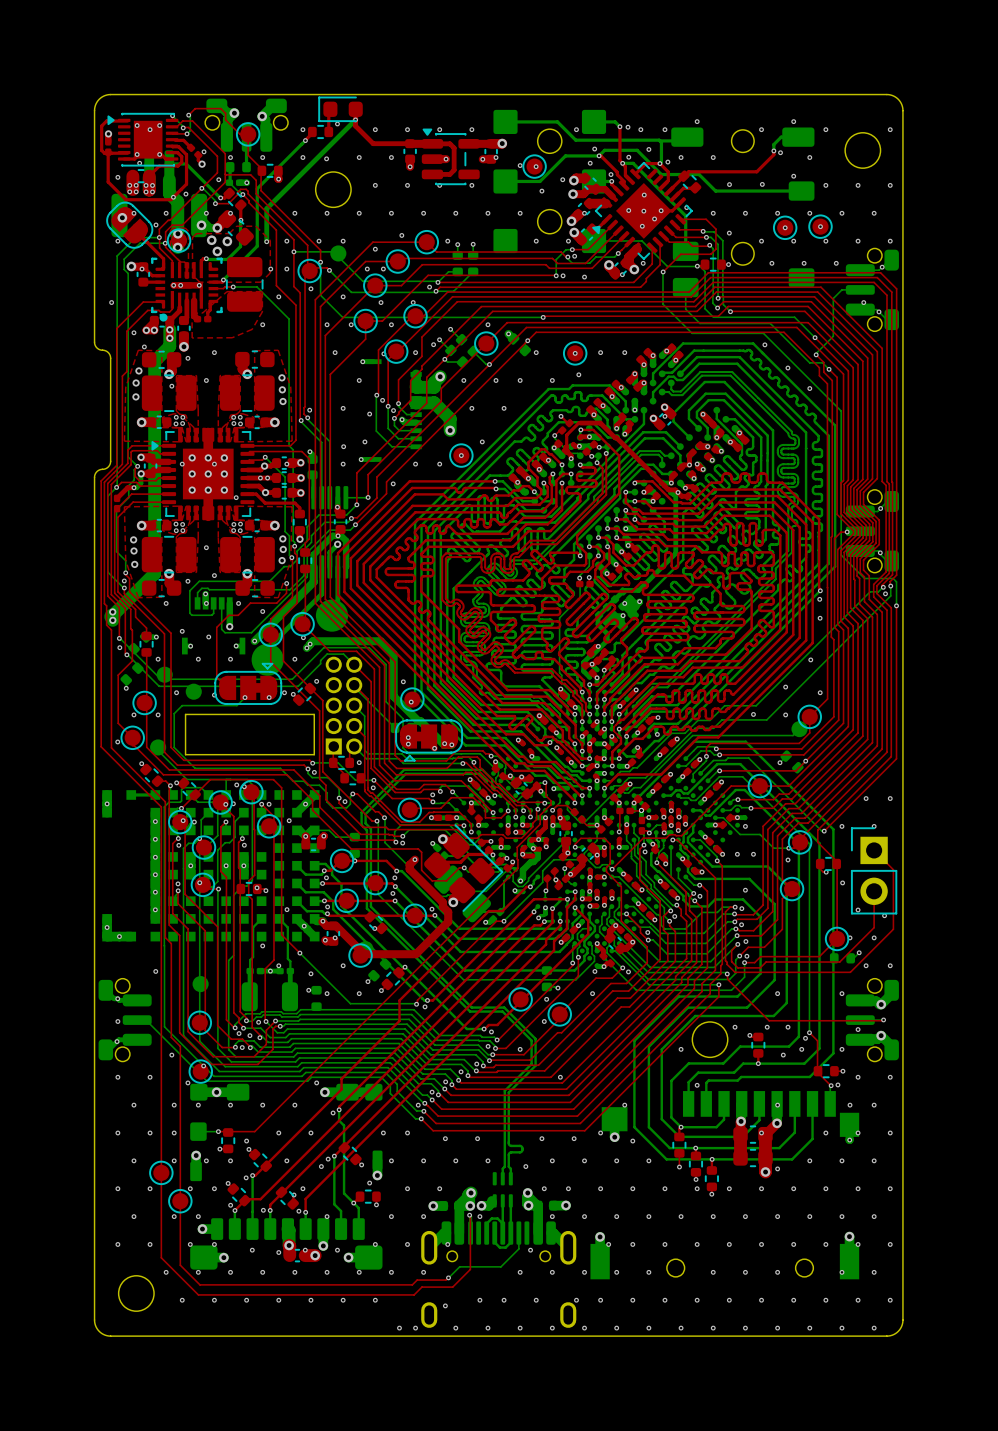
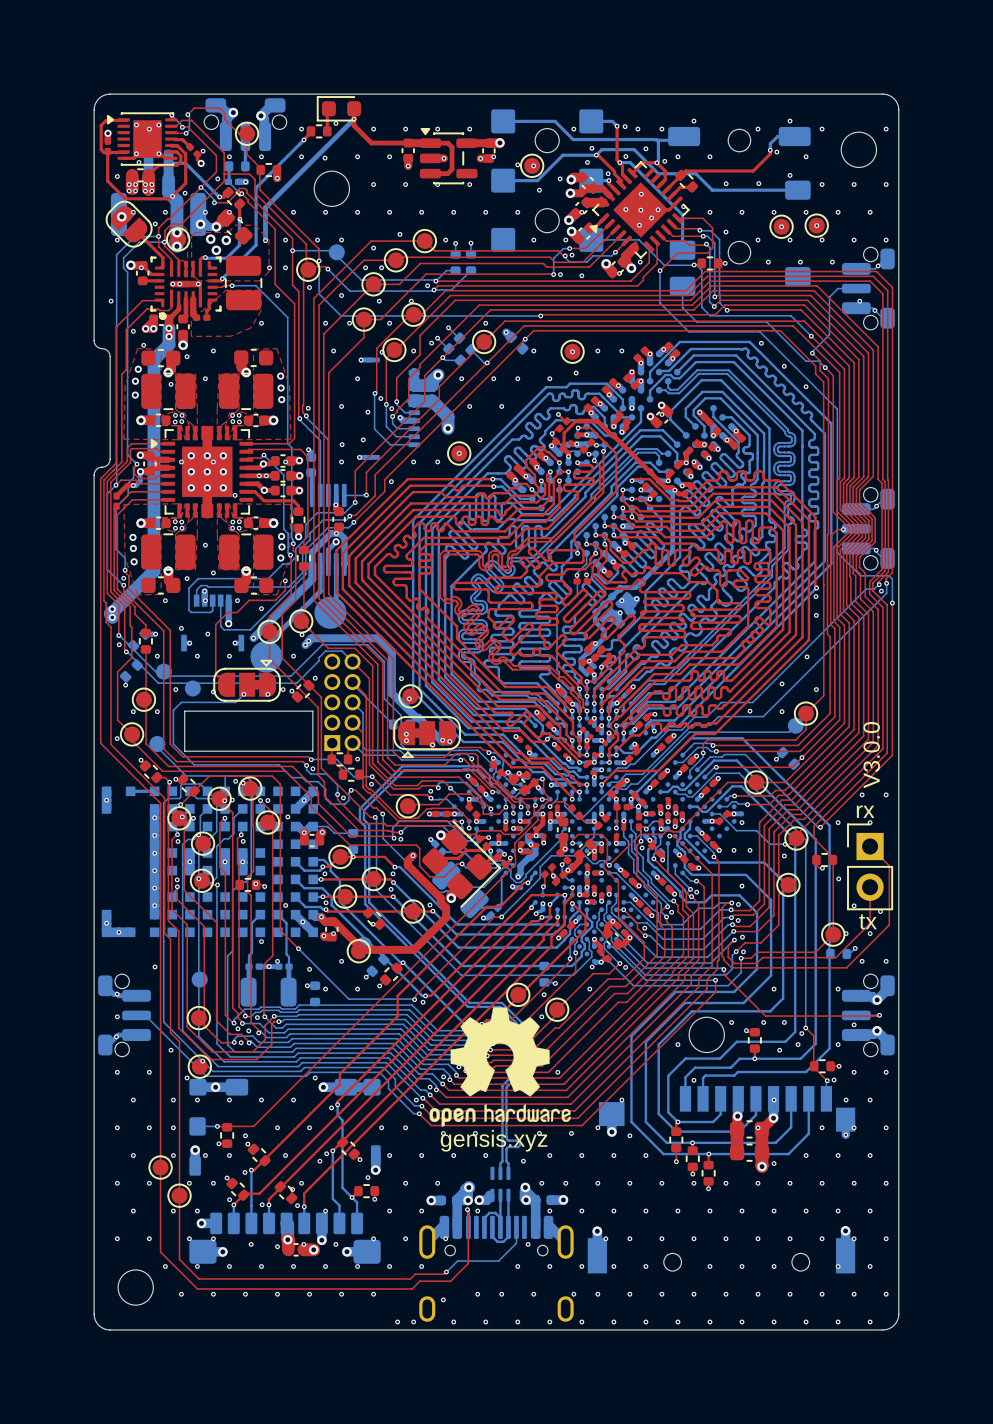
text: none -> V3.0.0 (871, 755)
text: none -> rx (865, 811)
text: none -> tx (868, 921)
drawing: none -> [429, 1007, 571, 1127]
text: none -> gensis.xyz (494, 1140)

